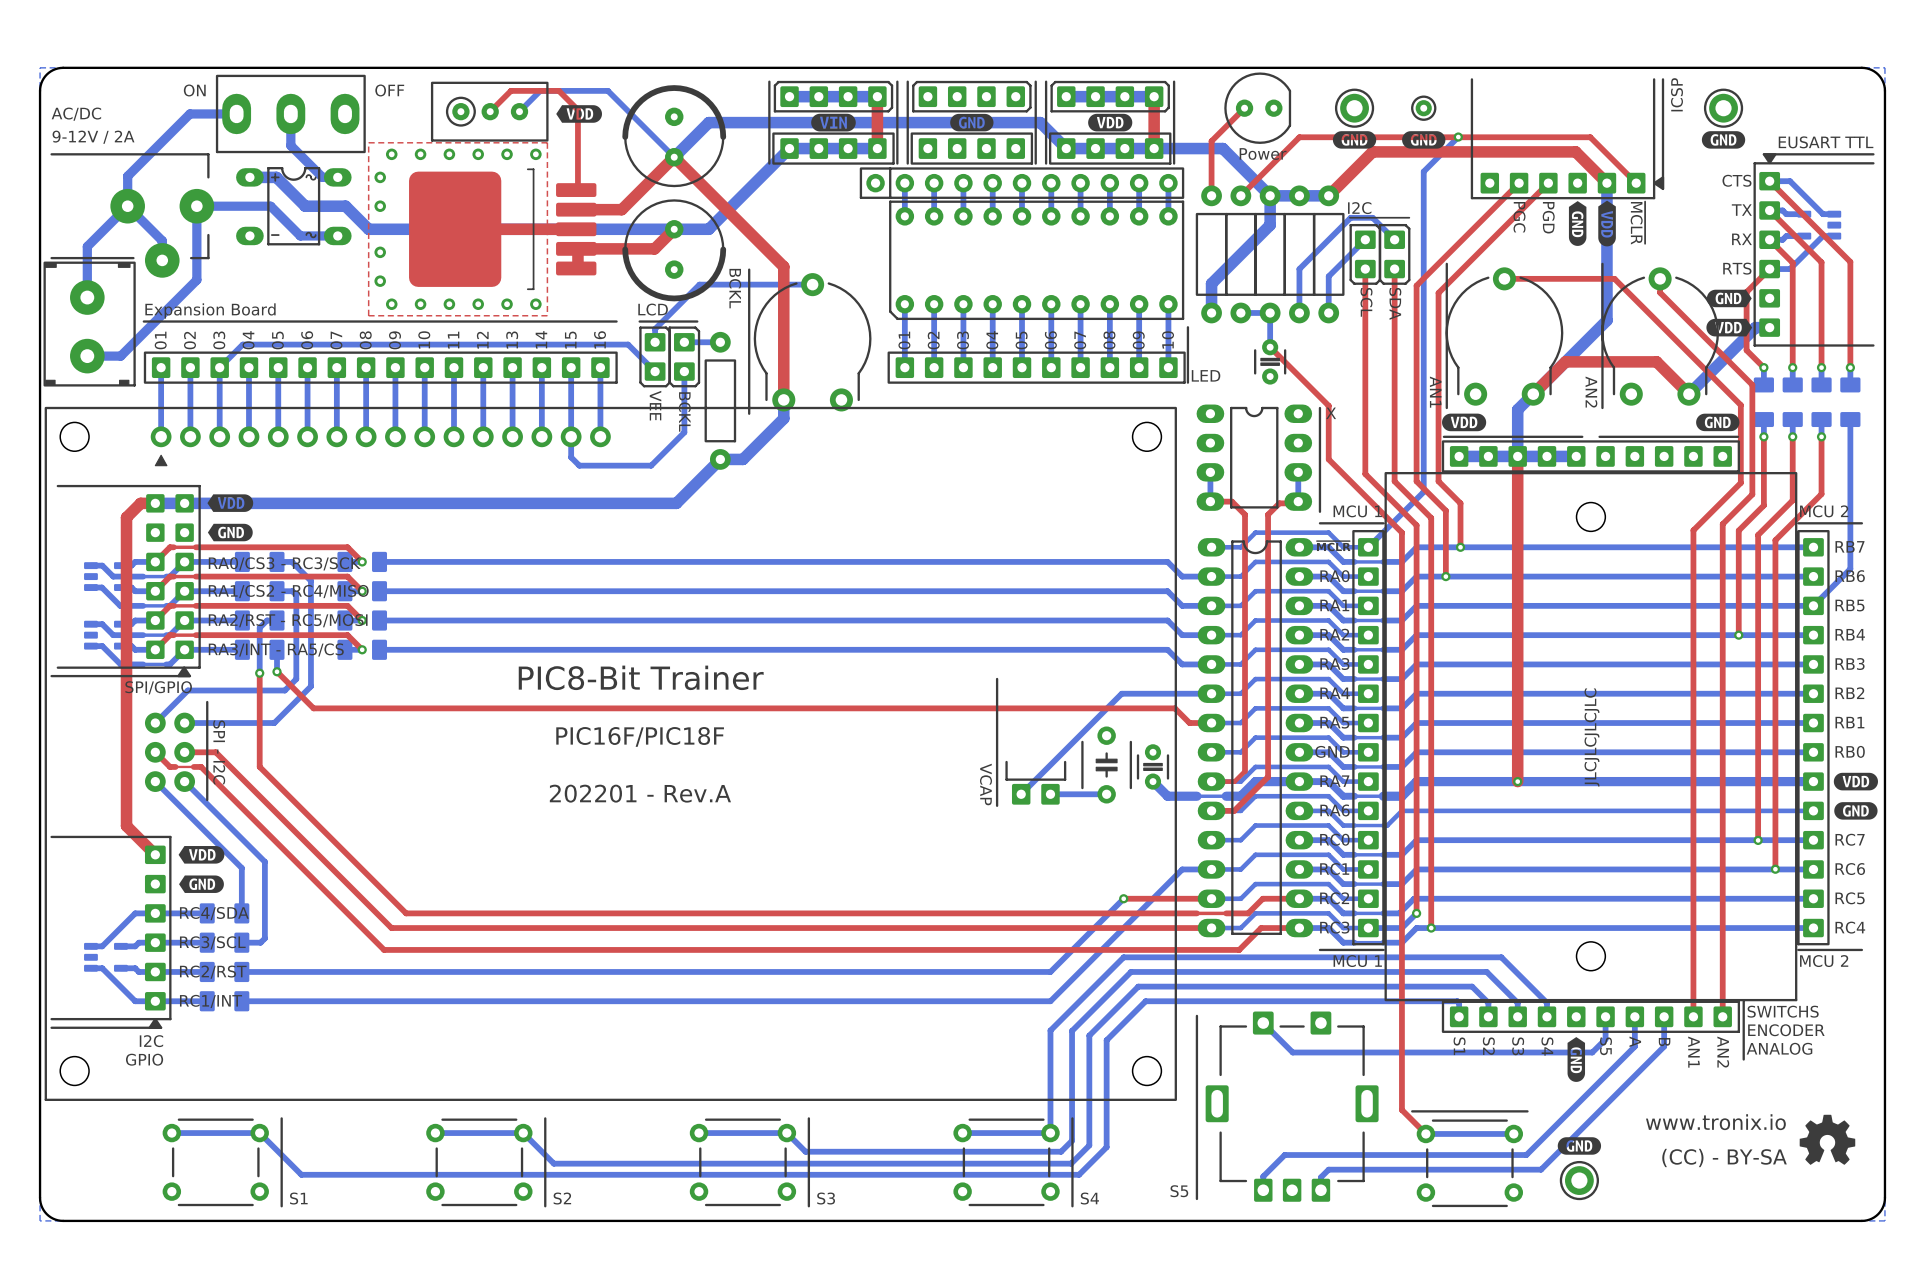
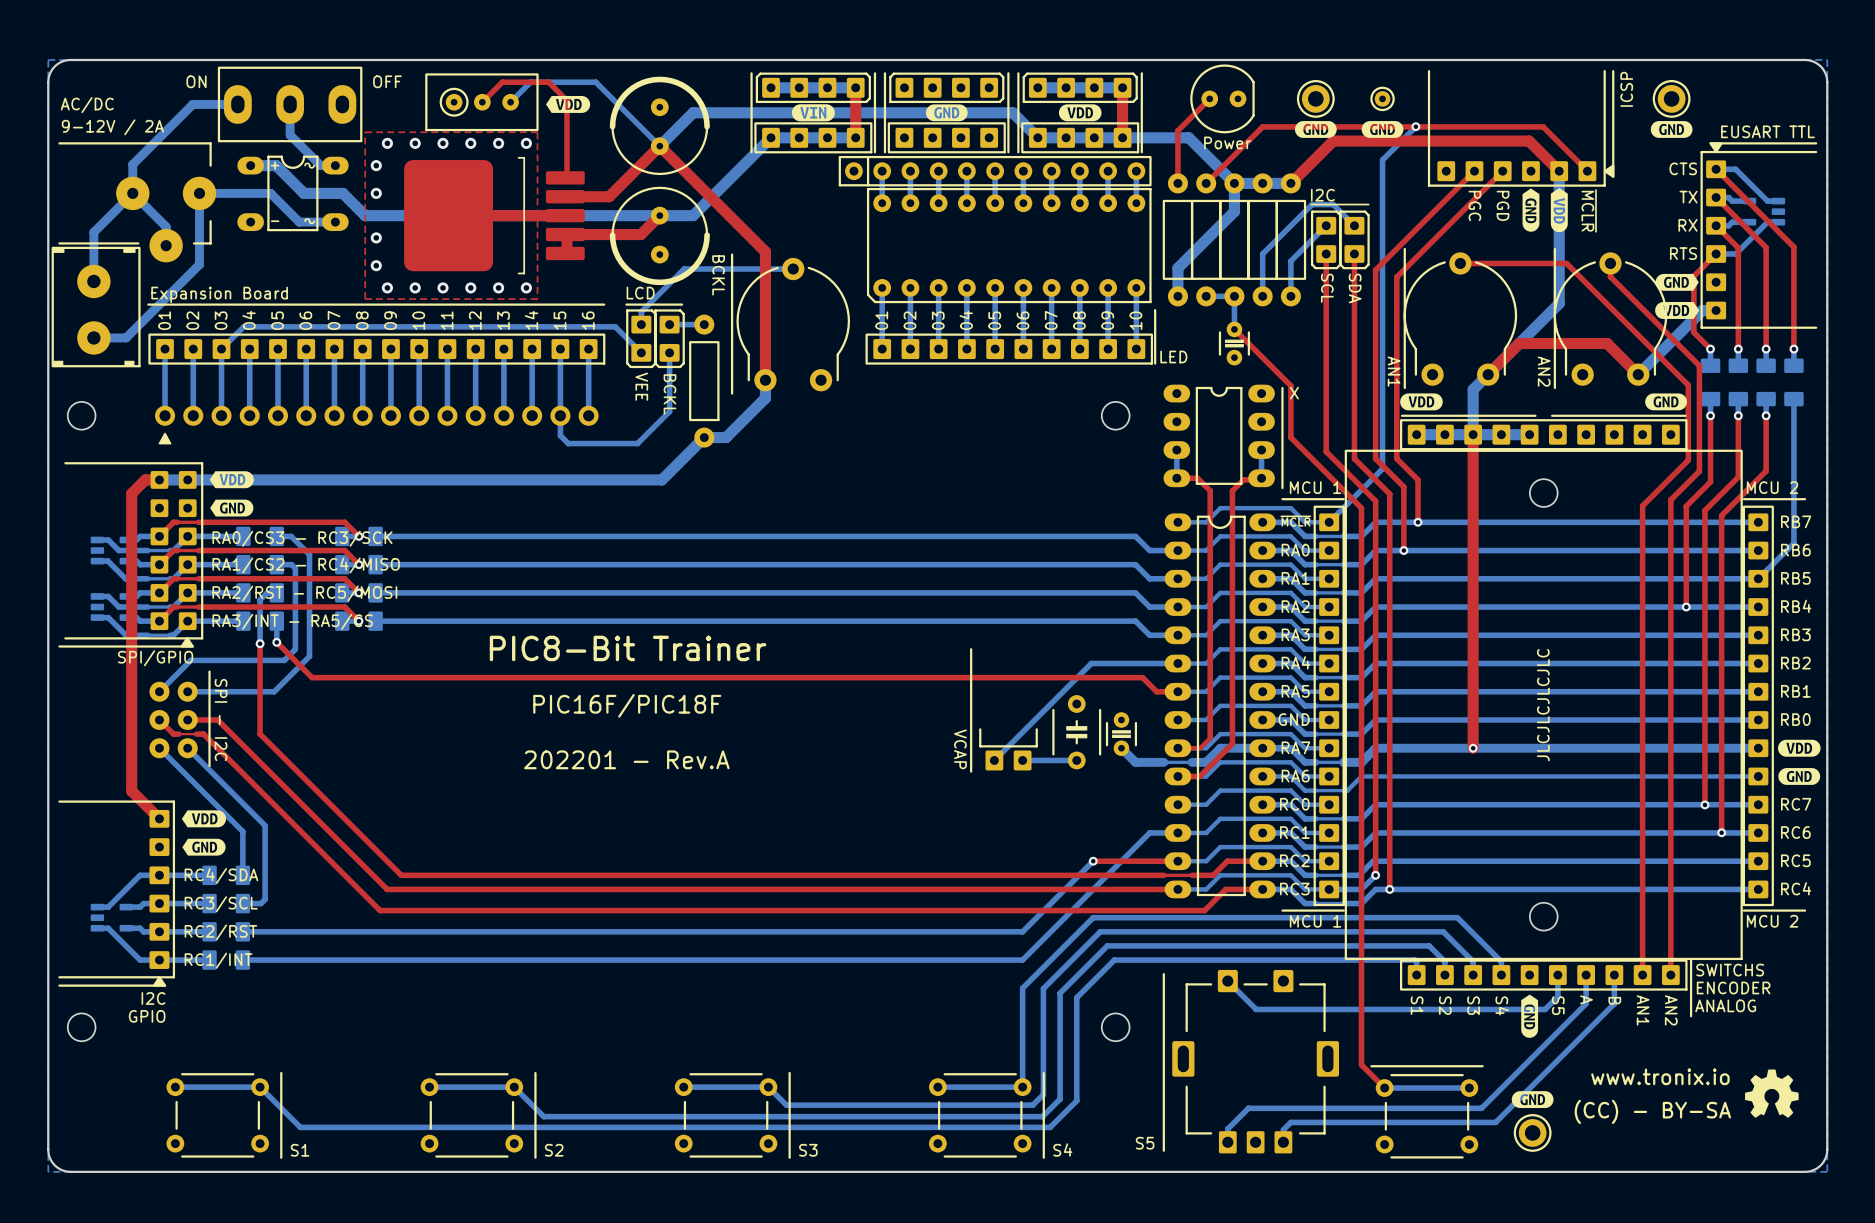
part: none -> (376, 425)
part: (610, 753) -> none

